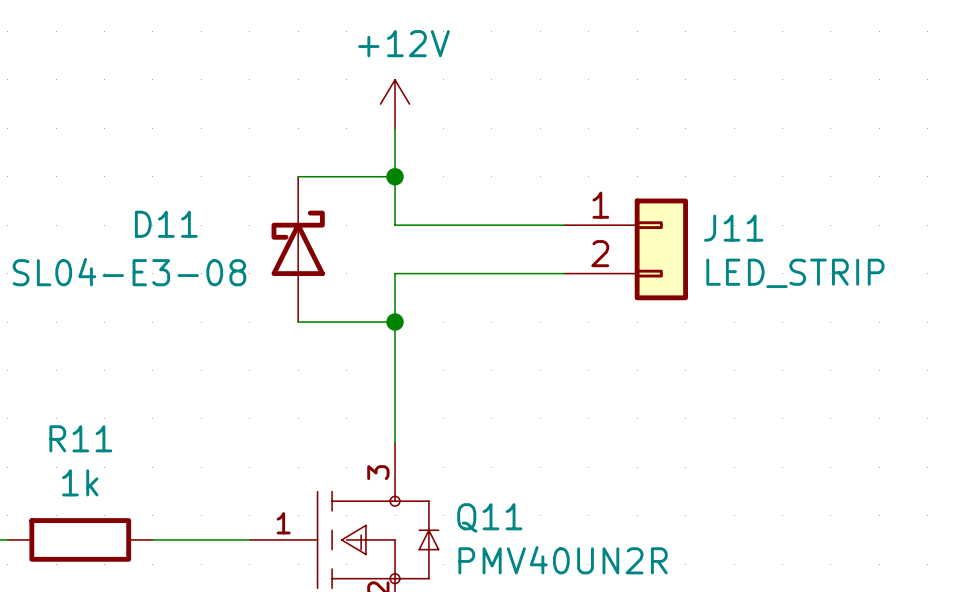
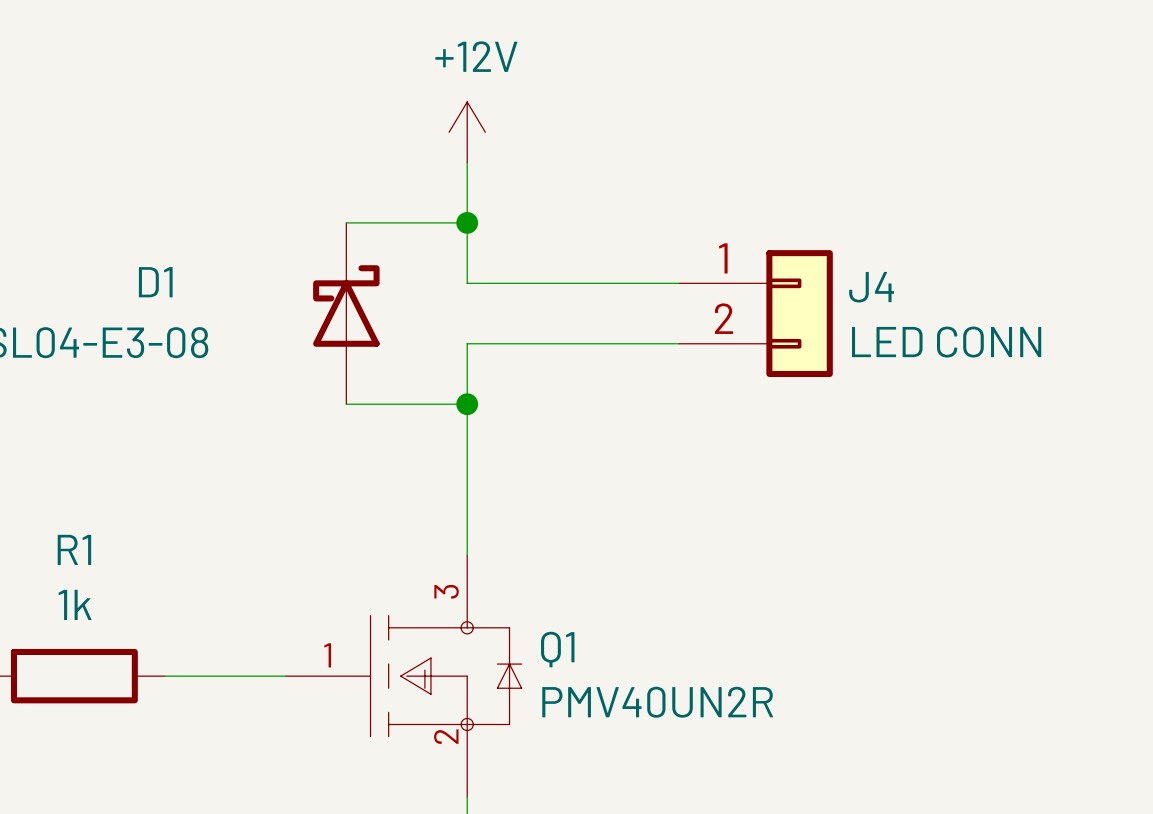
D11 name: D11 (166, 224) -> D1 (155, 282)
J11 name: J11 (733, 228) -> J4 (871, 287)
J11 value: LED_STRIP (795, 273) -> LED CONN (946, 342)
R11 name: R11 (80, 438) -> R1 (74, 549)
Q11 name: Q11 (489, 517) -> Q1 (557, 649)

